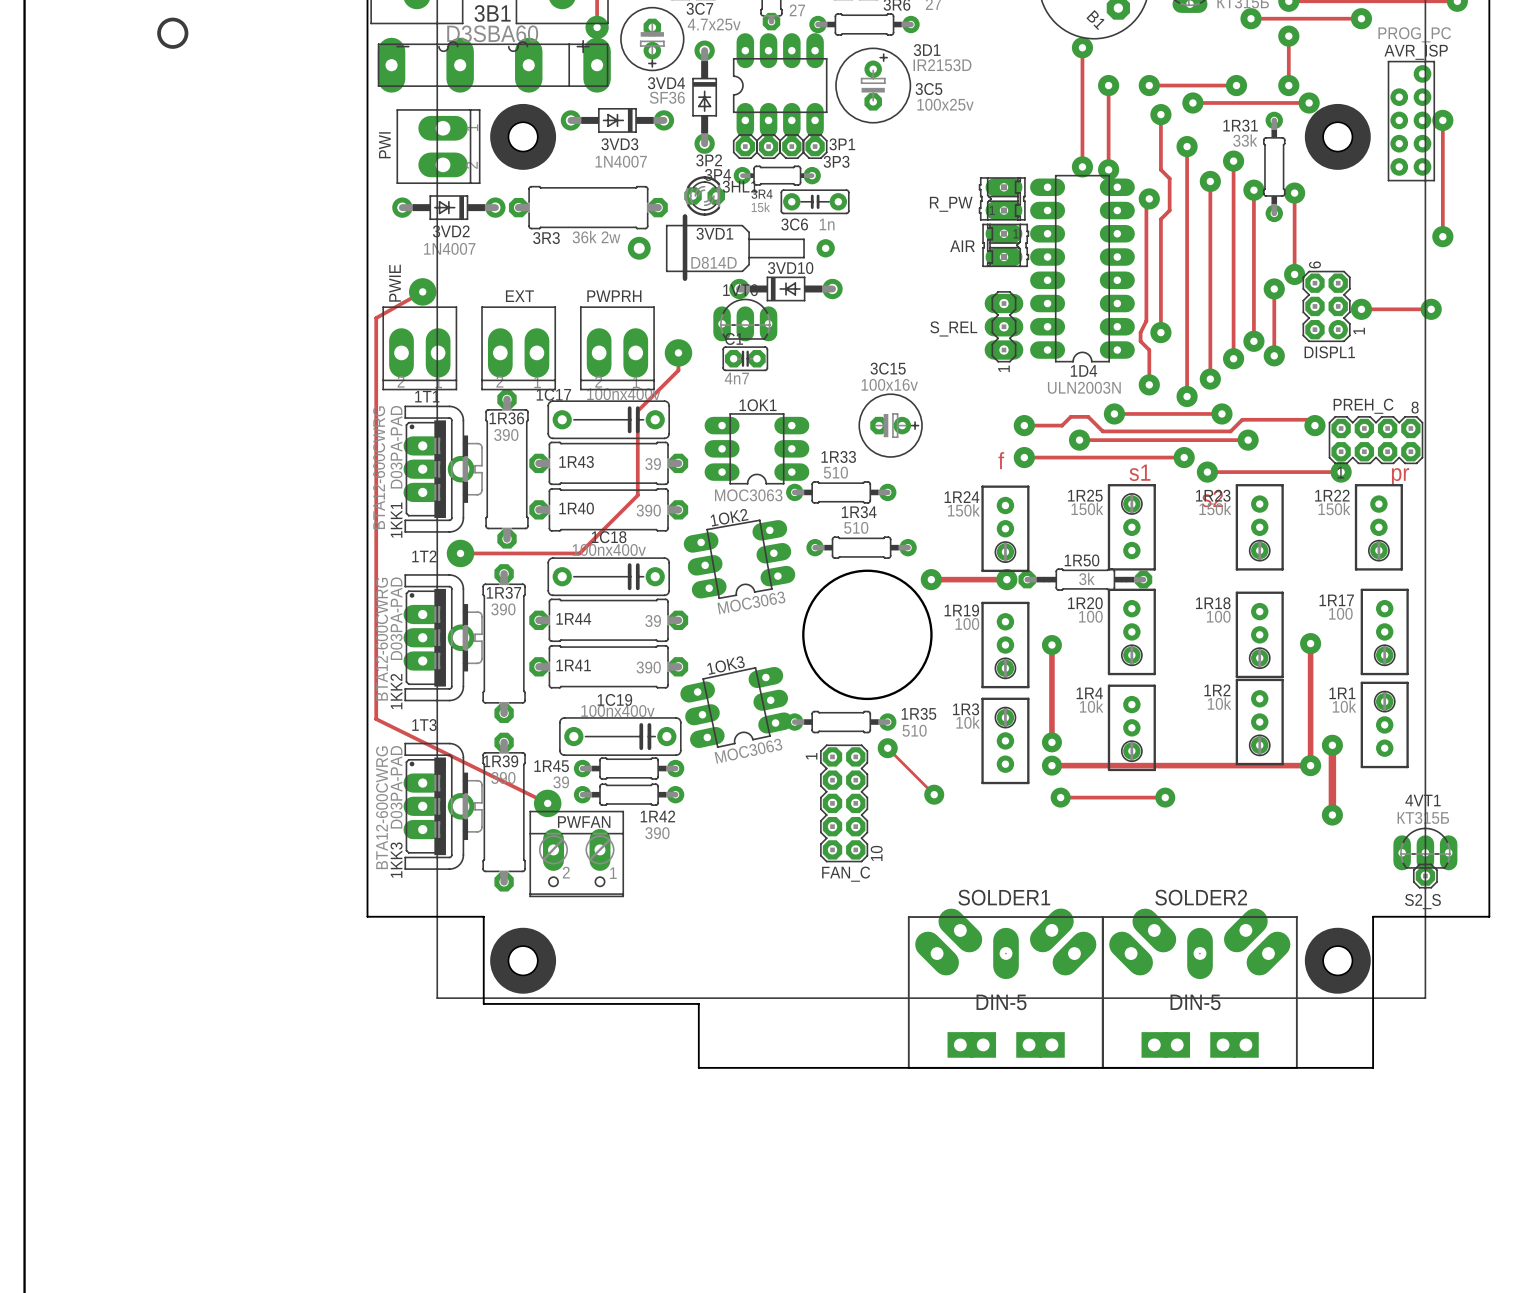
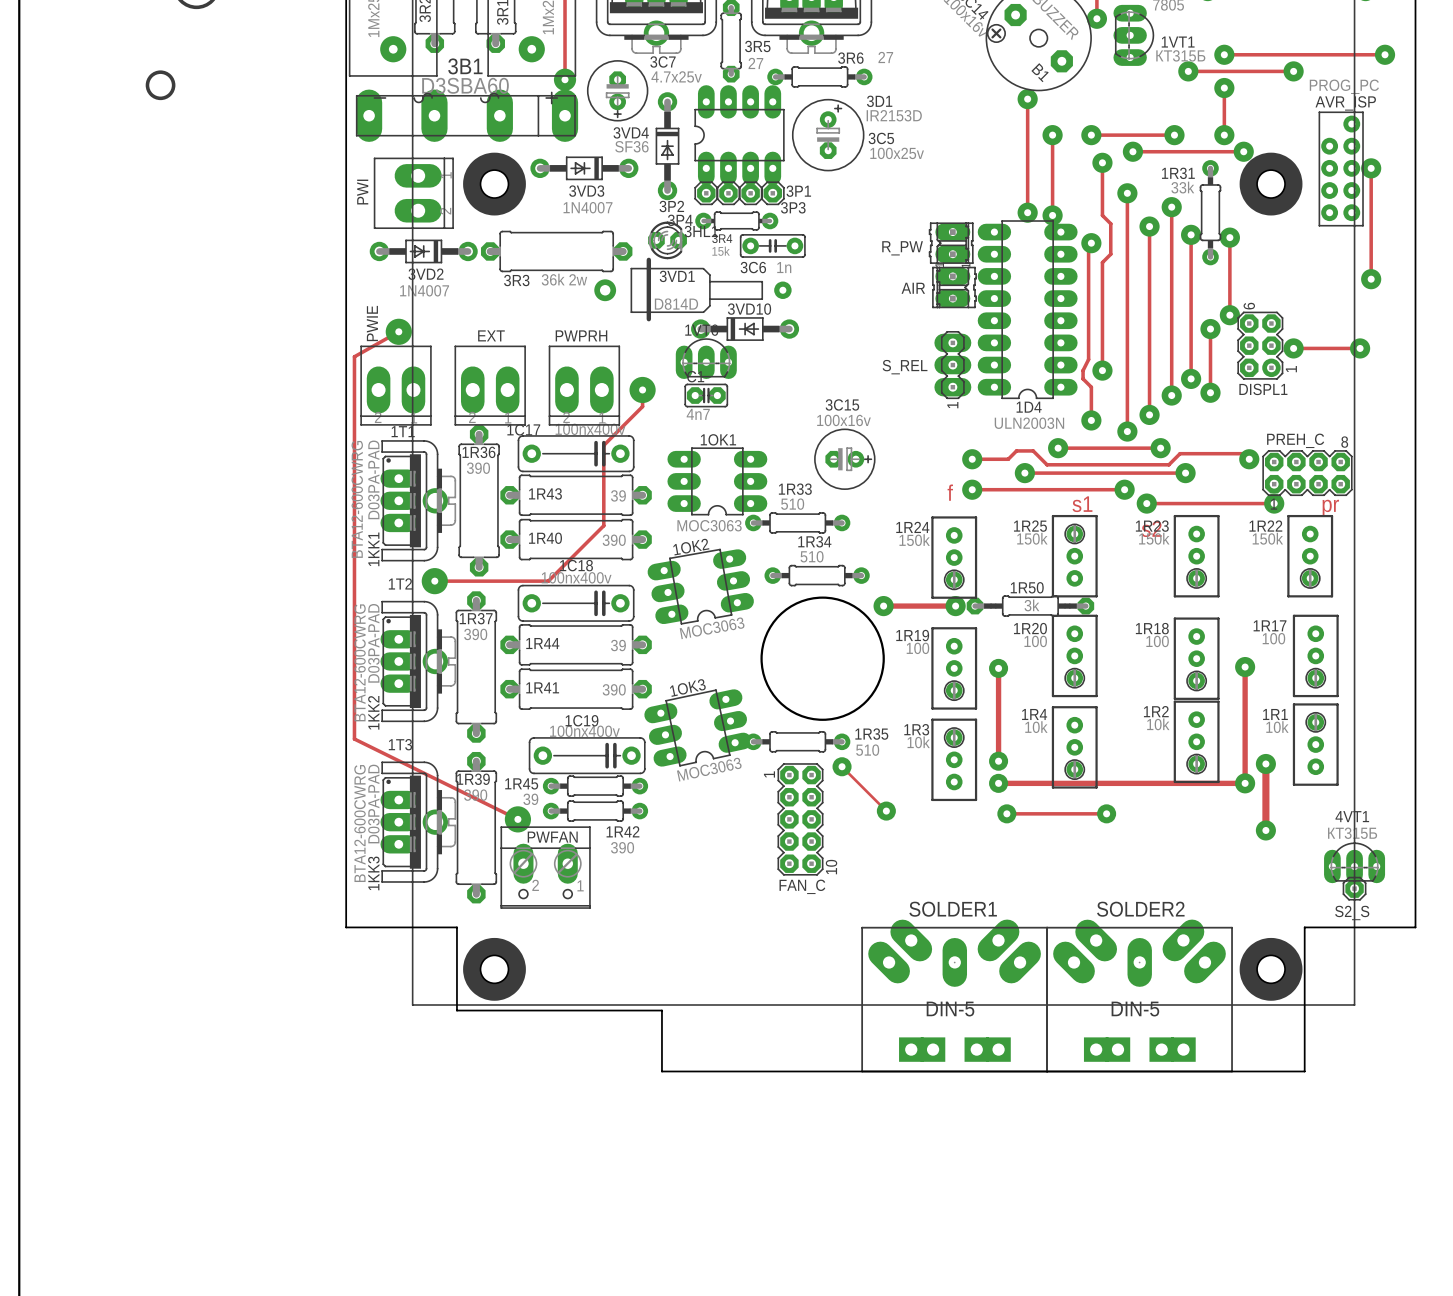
R_PW footprint: [978, 177, 1026, 221] -> [928, 222, 974, 264]
AIR footprint: [982, 223, 1030, 268] -> [932, 266, 977, 309]

